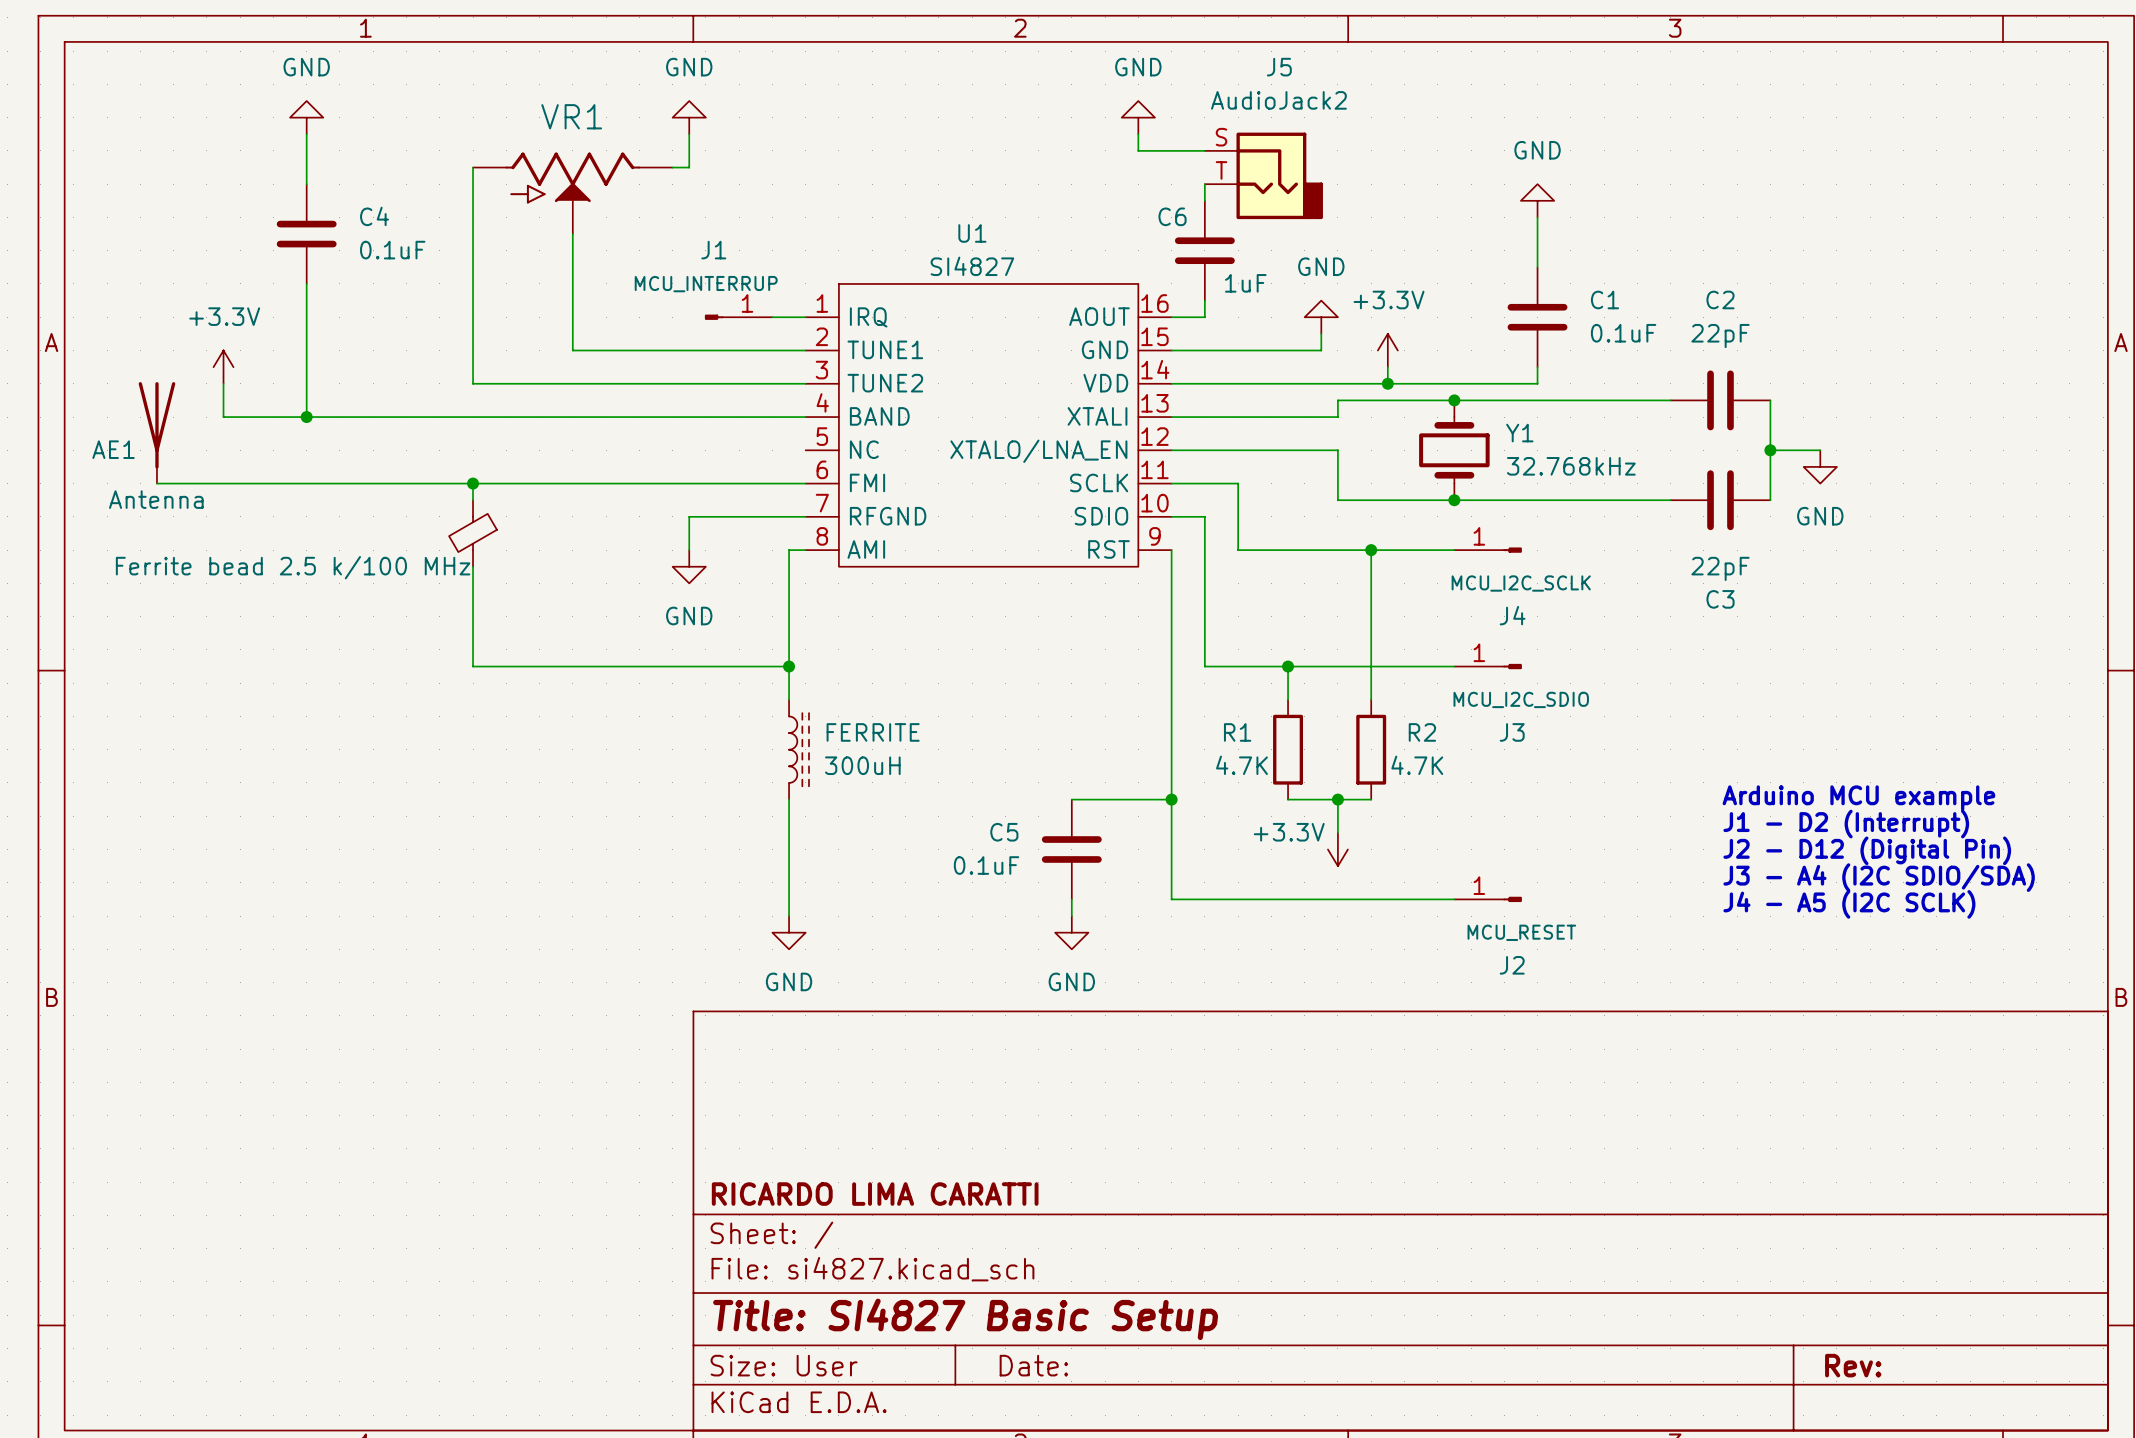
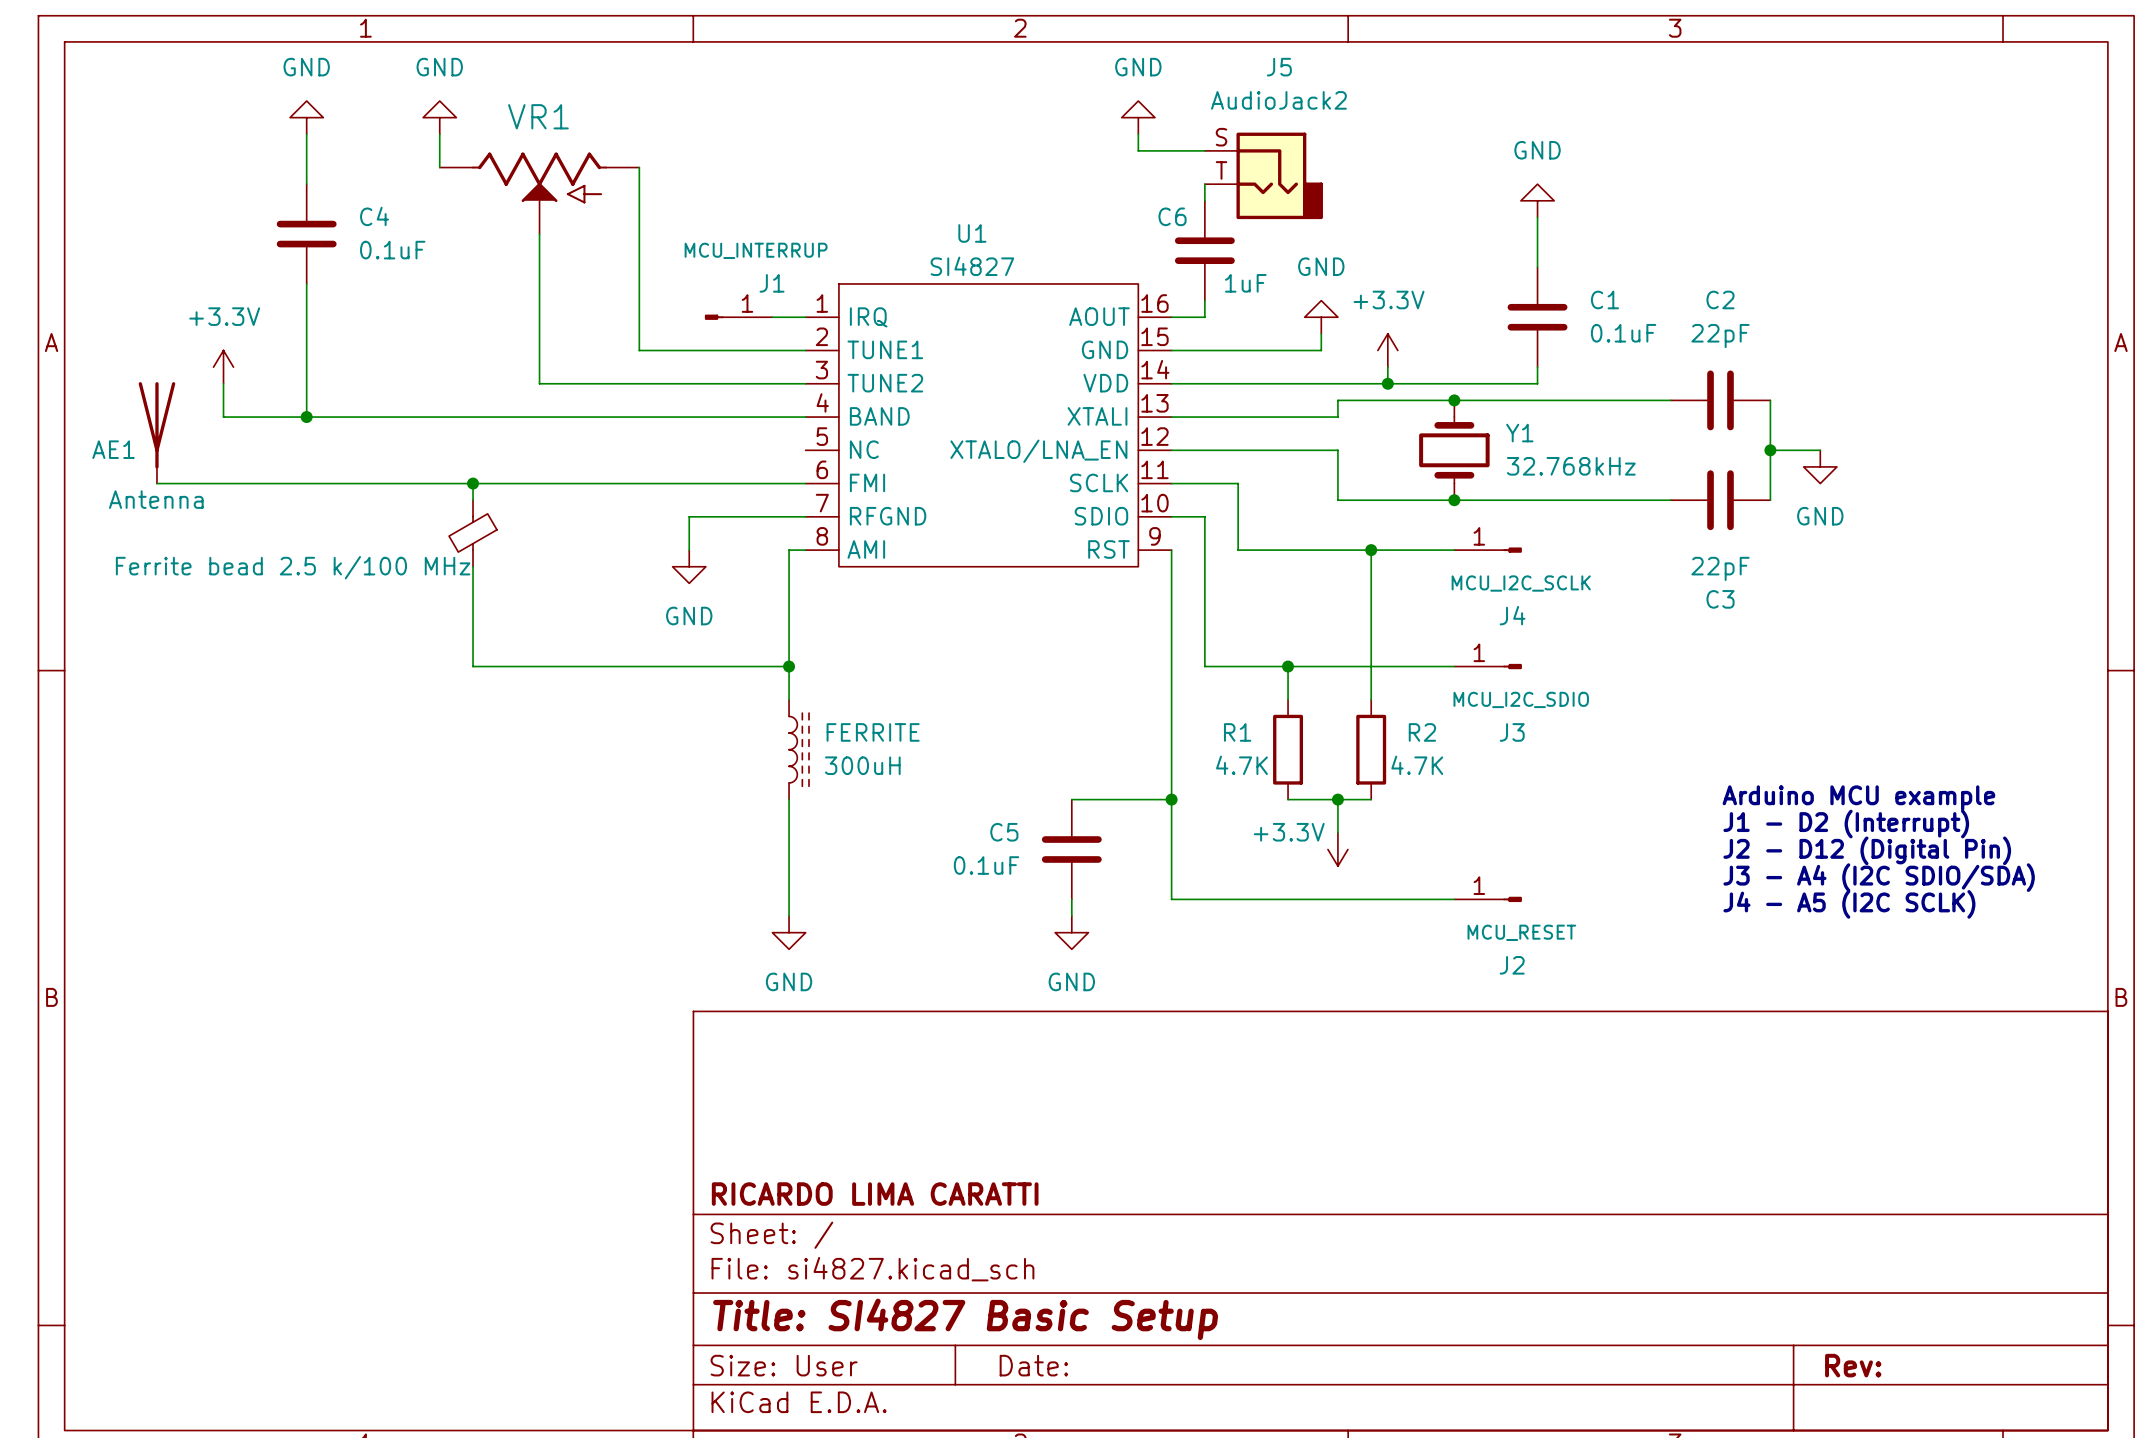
power symbol position: GND (689, 117) -> GND (439, 117)
wire: none -> (439, 134) (439, 167)
wire: (689, 134) (689, 167) (672, 167) -> none
wire: (473, 167) (473, 383) (539, 383) -> (539, 234) (539, 383)
VR1 flip: as is (572, 178) -> left-right (539, 178)
wire: (572, 234) (572, 350) (639, 350) -> (639, 167) (639, 350)
J1 name position: J1 (713, 250) -> J1 (772, 283)
J1 value position: MCU_INTERRUP (706, 284) -> MCU_INTERRUP (756, 250)

